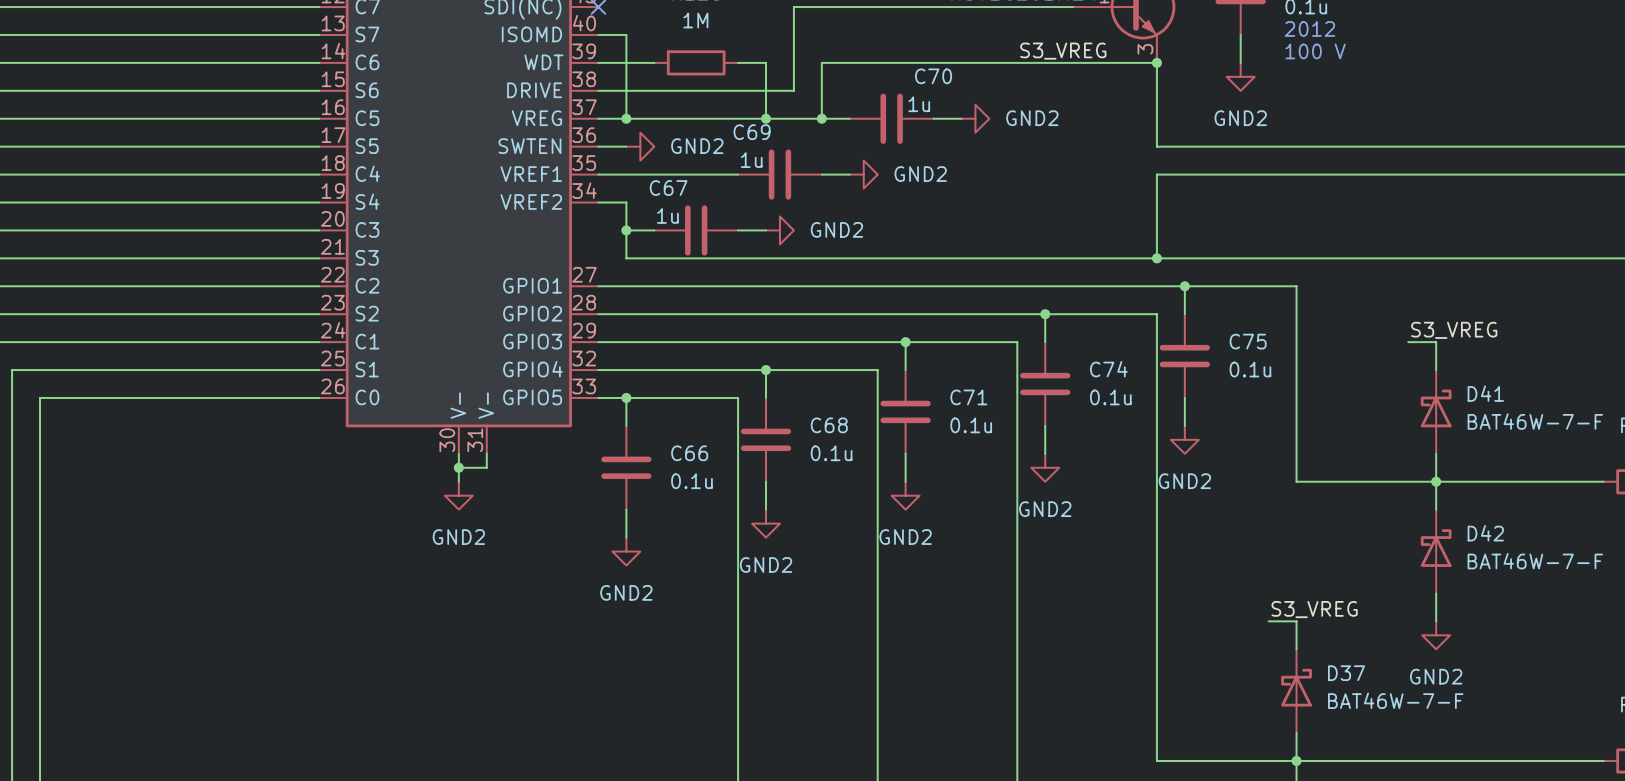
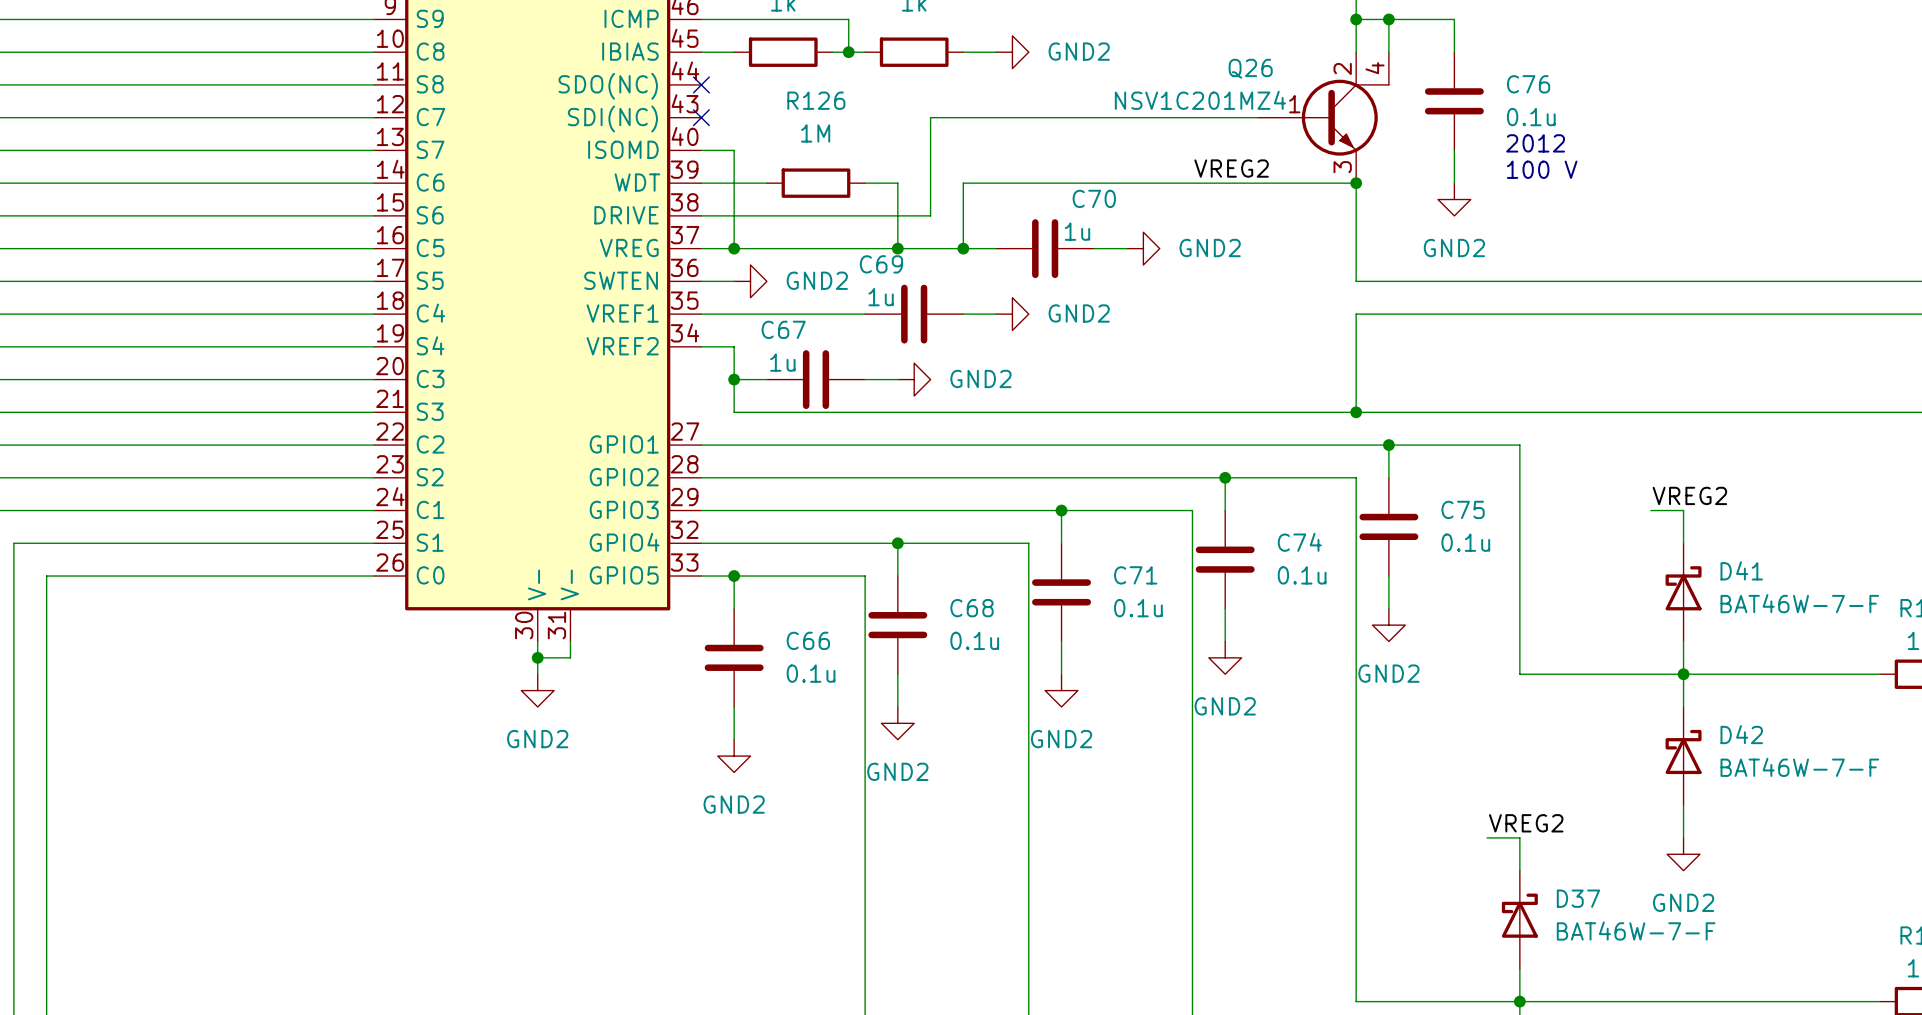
label: S3_VREG (1063, 51) -> VREG2 (1231, 168)
label: S3_VREG (1454, 330) -> VREG2 (1689, 495)
label: S3_VREG (1314, 609) -> VREG2 (1526, 823)

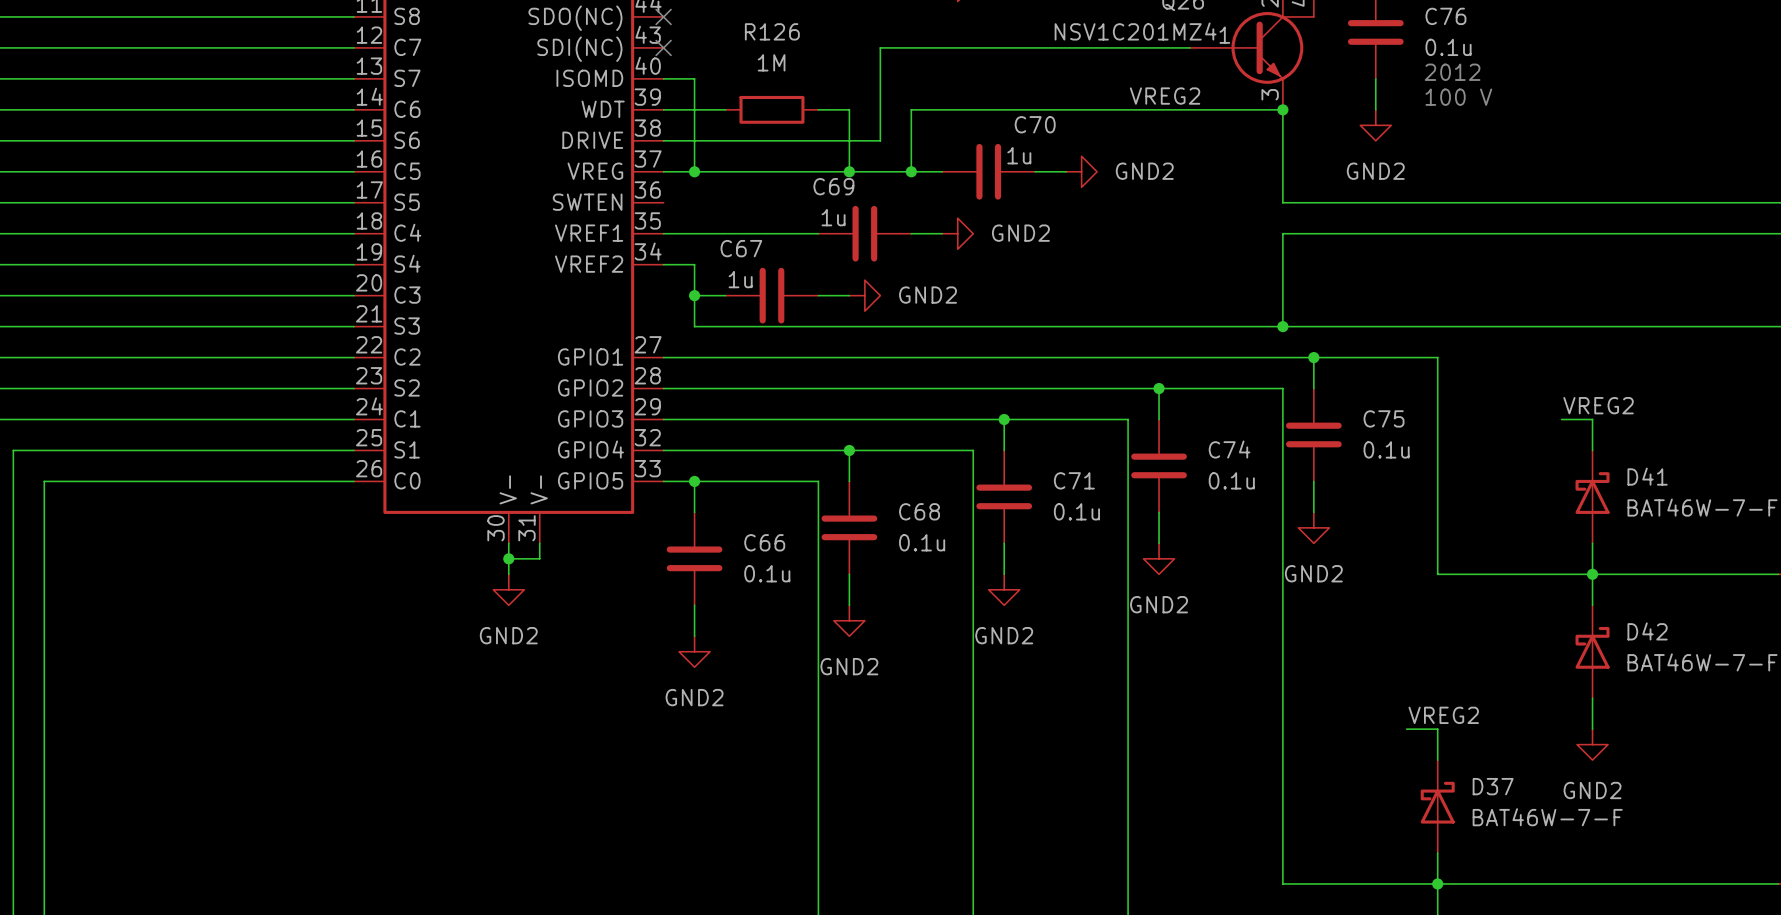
wire: (701, 281) (734, 281) -> none
power symbol: GND2 (750, 281) -> none

